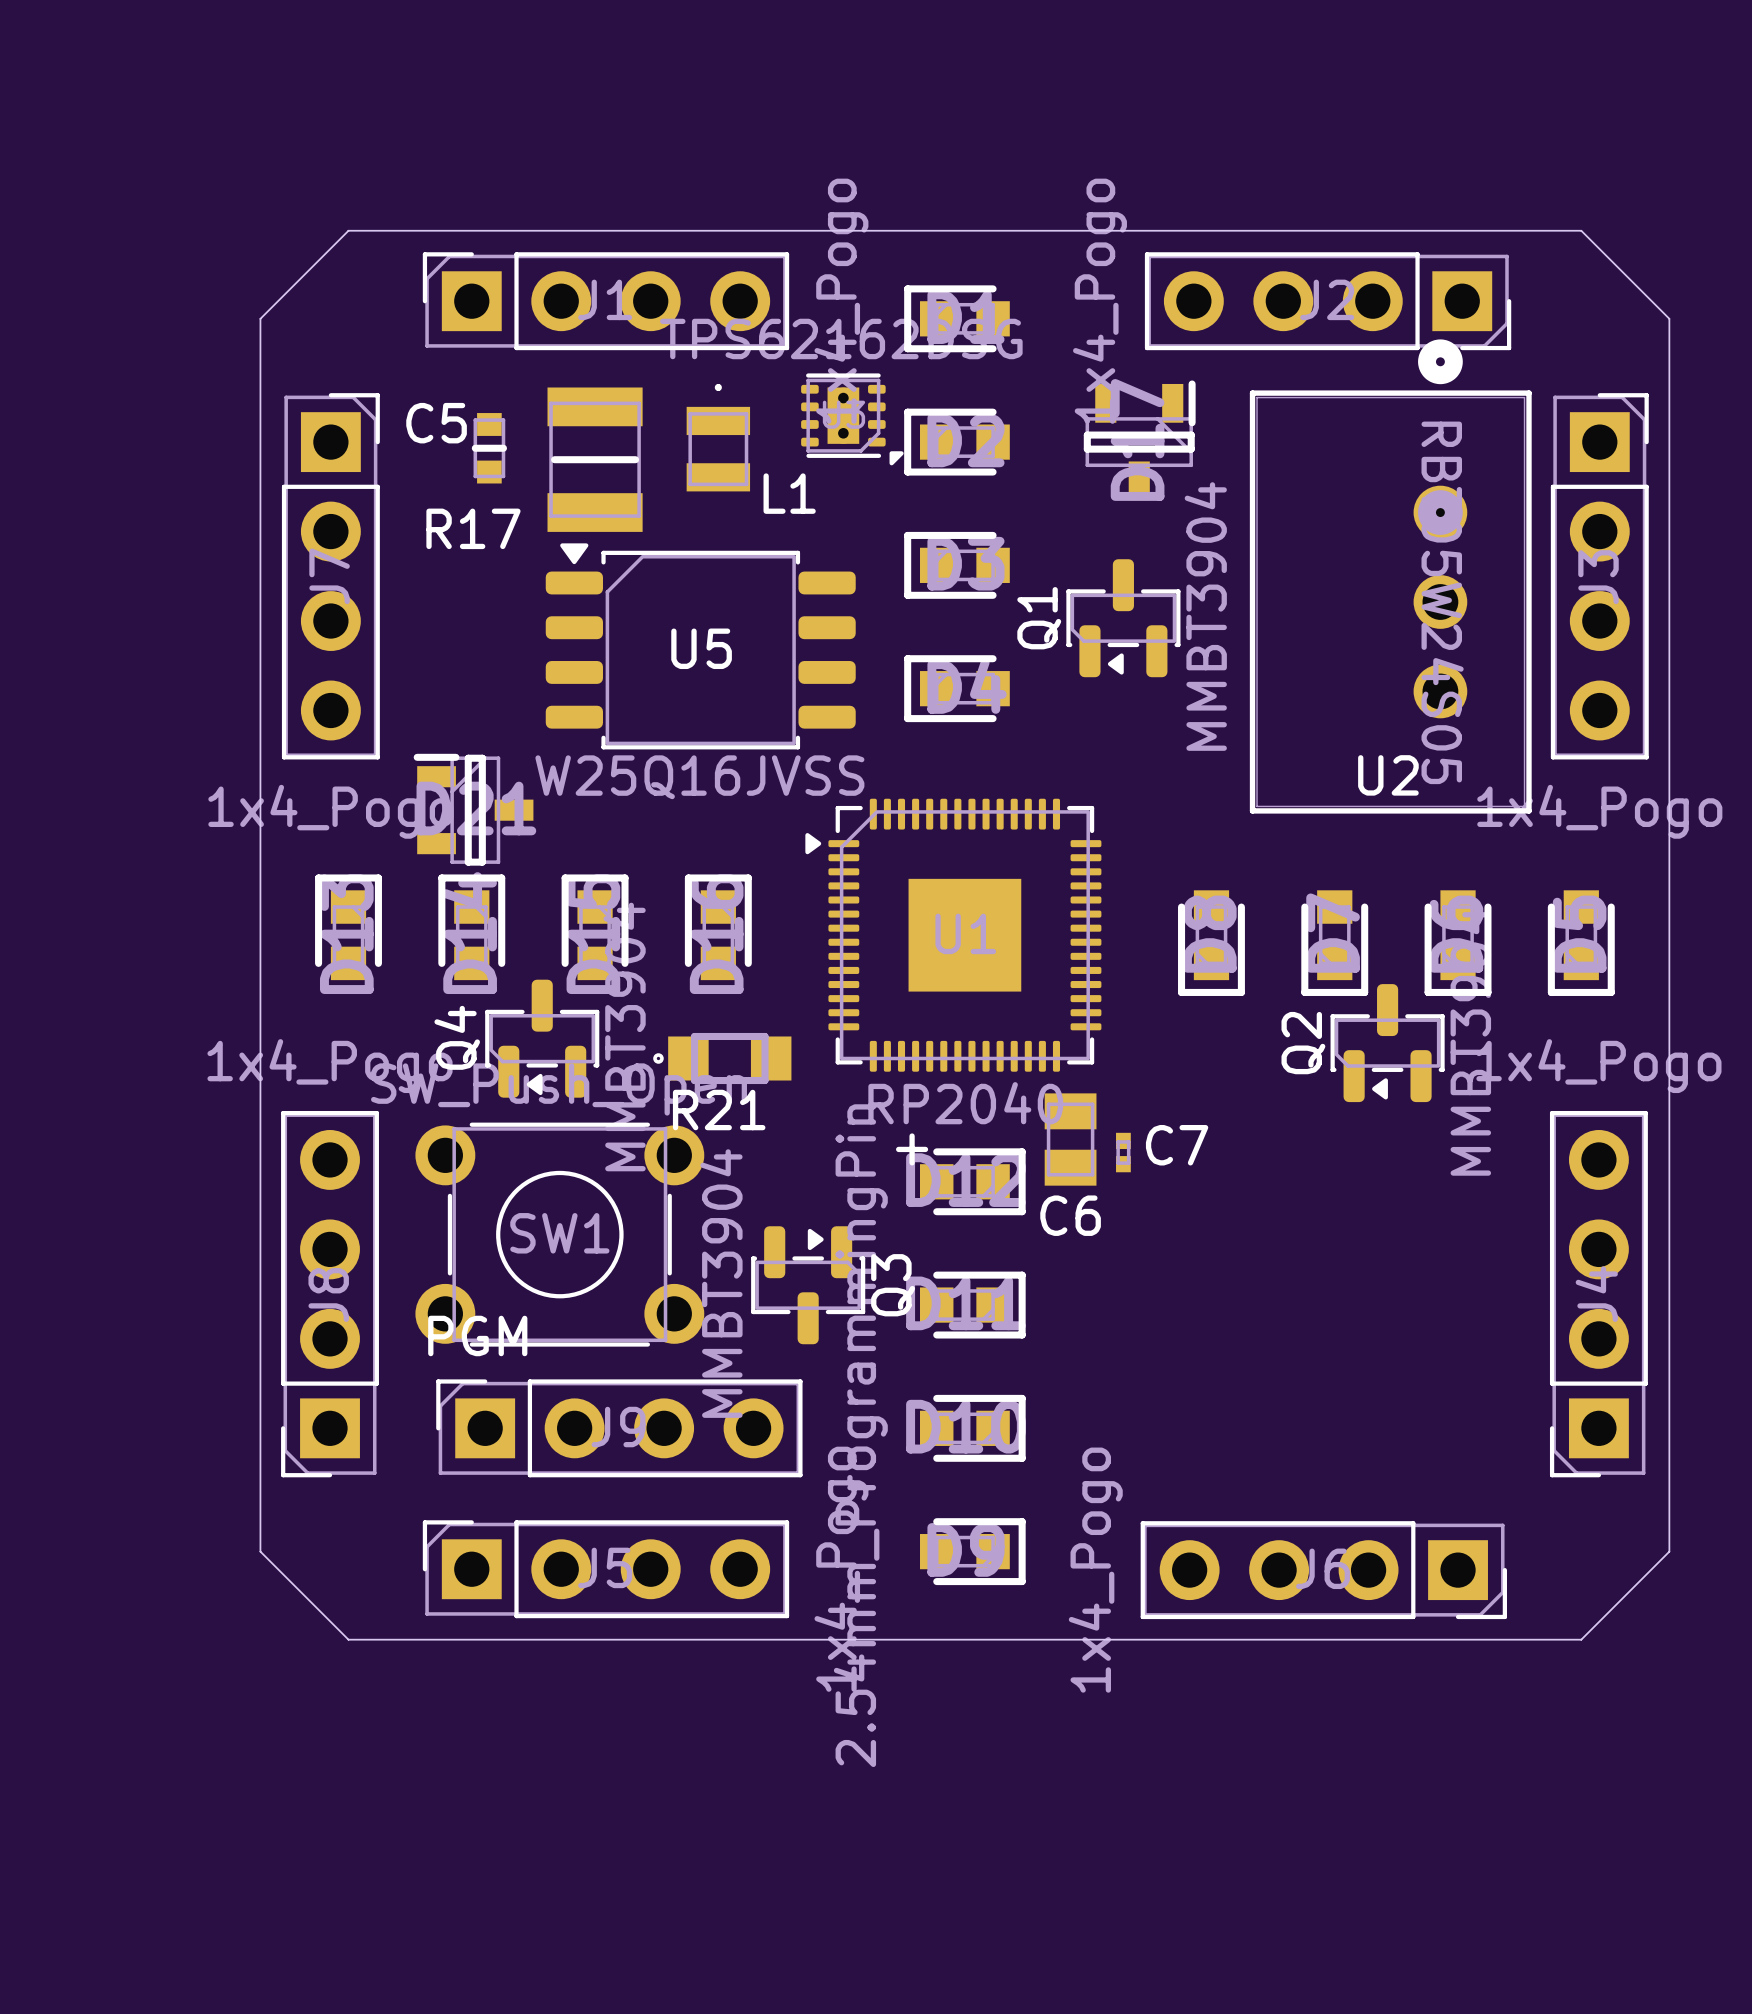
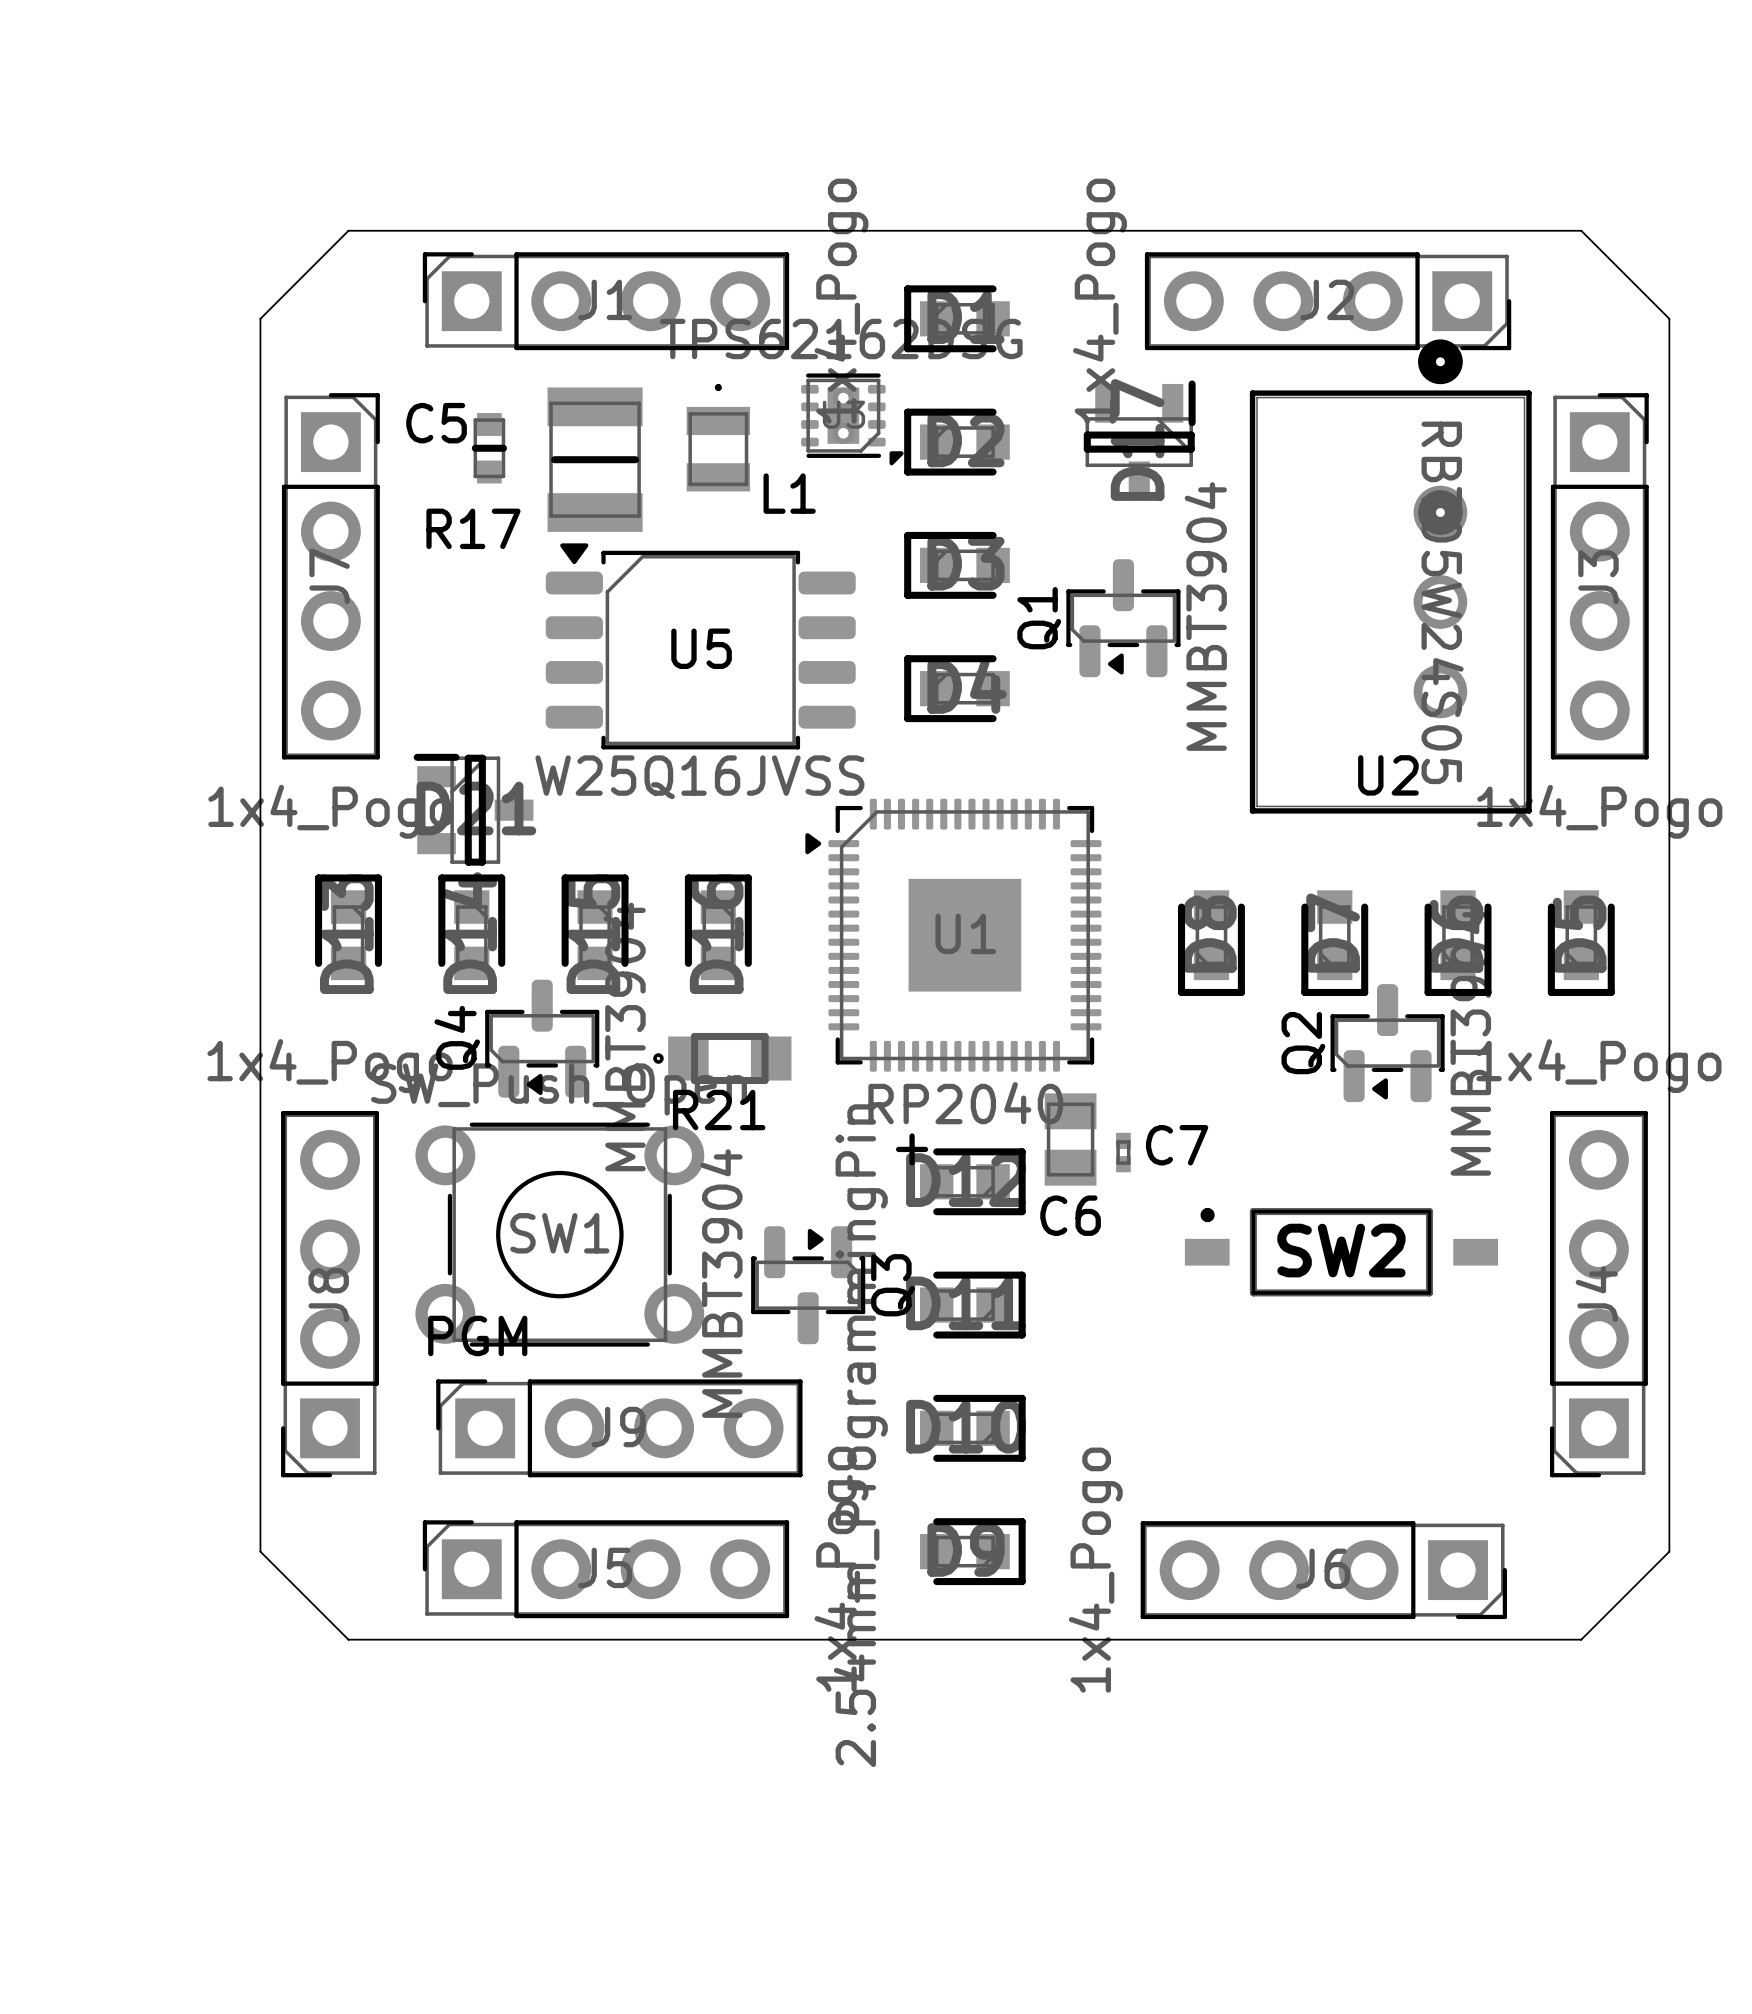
SW2: none -> (1341, 1252)

